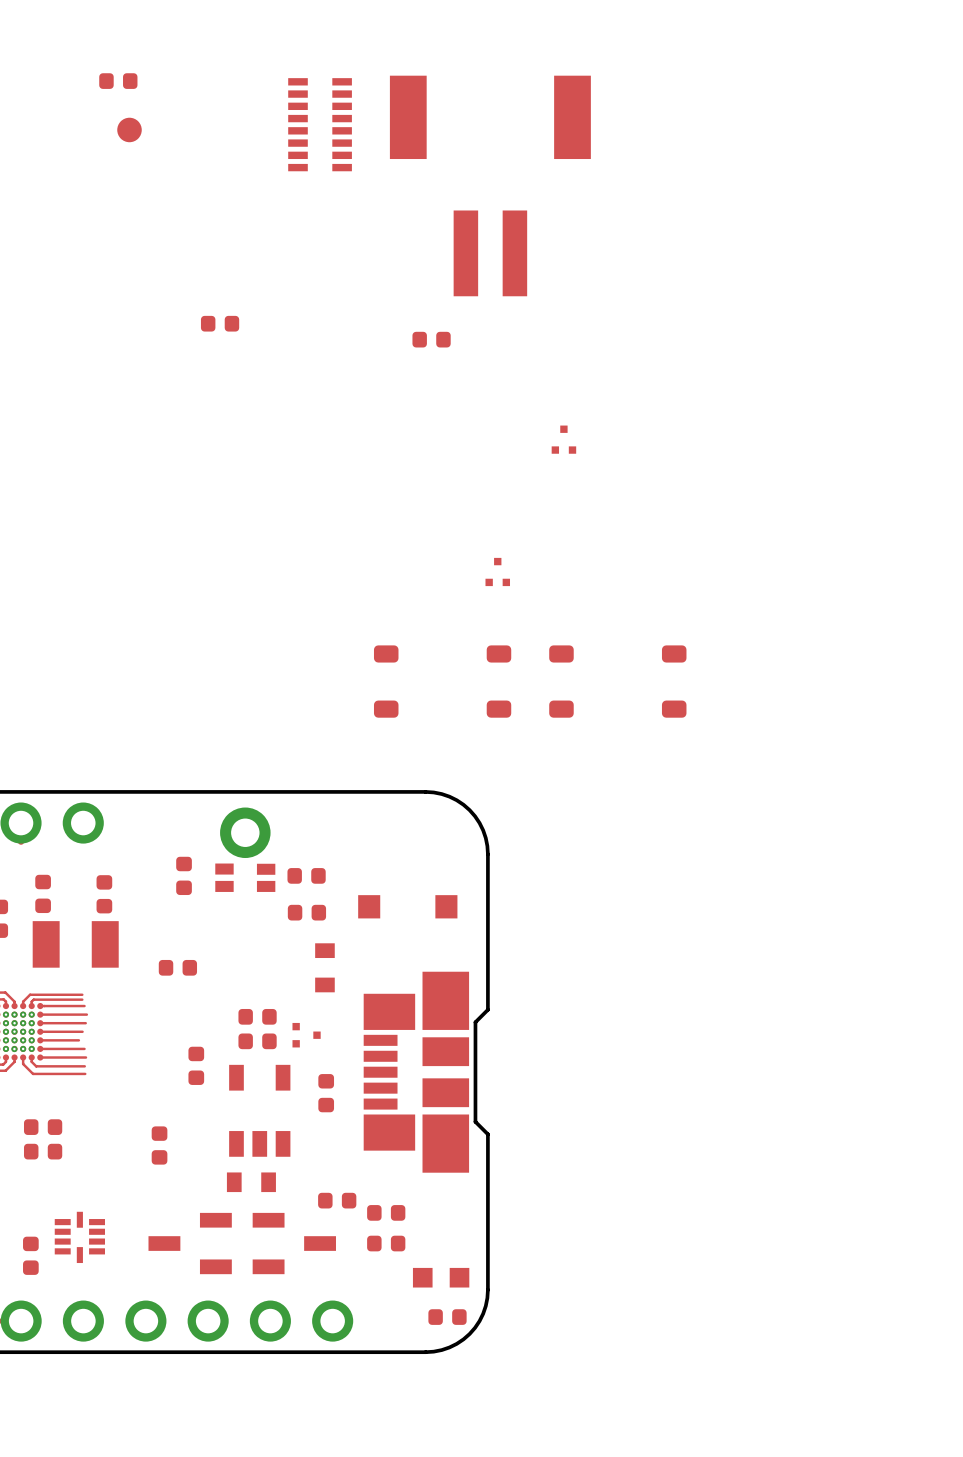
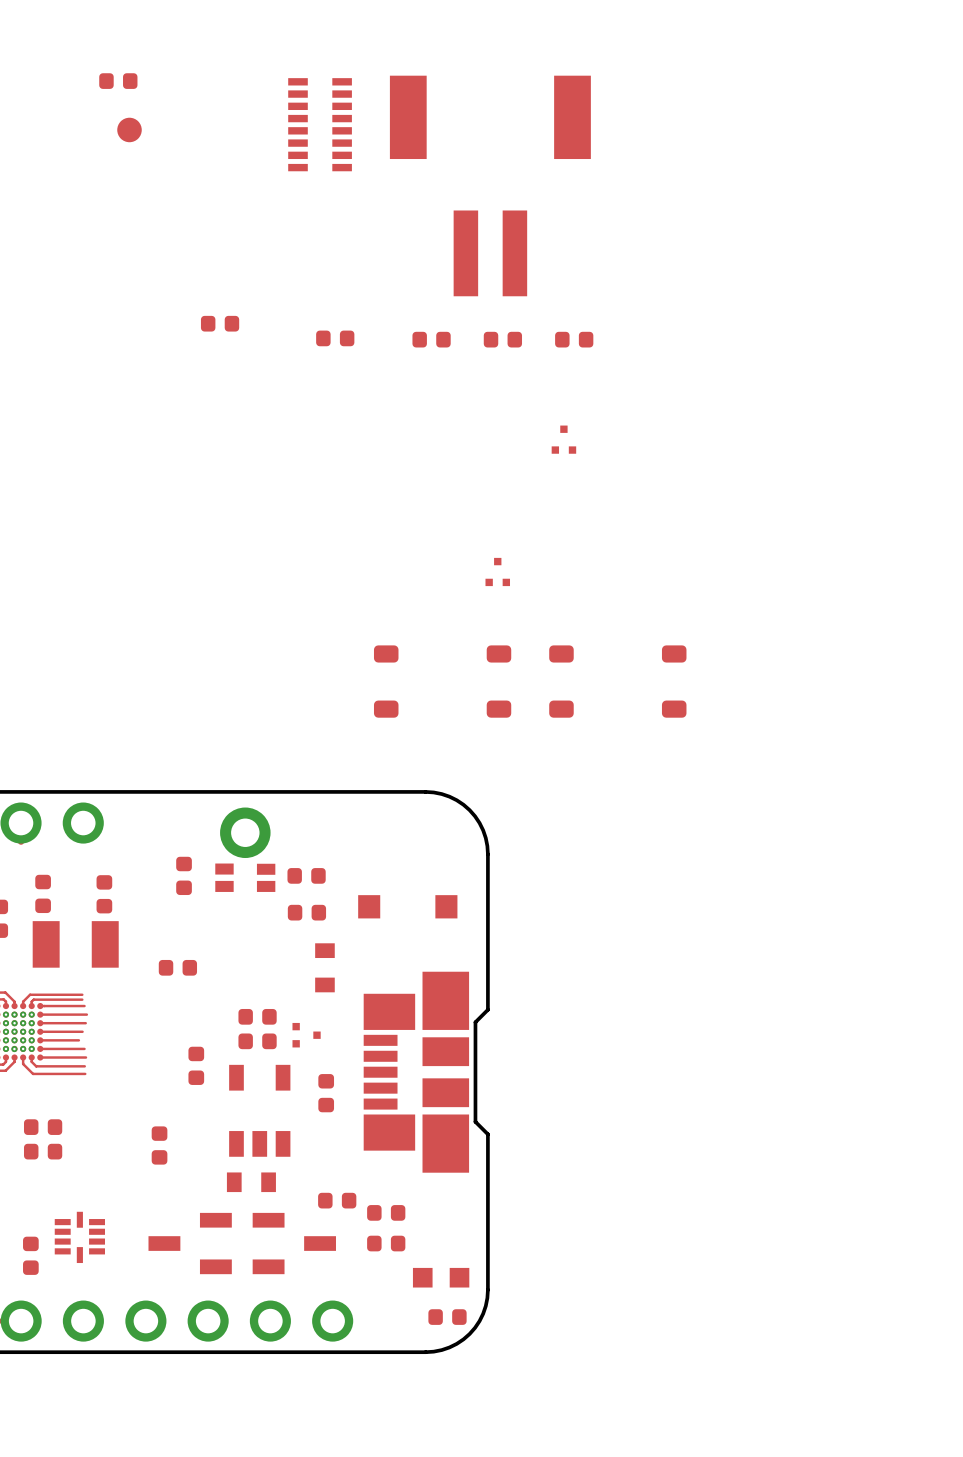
part: none -> (335, 338)
part: none -> (502, 339)
part: none -> (574, 339)

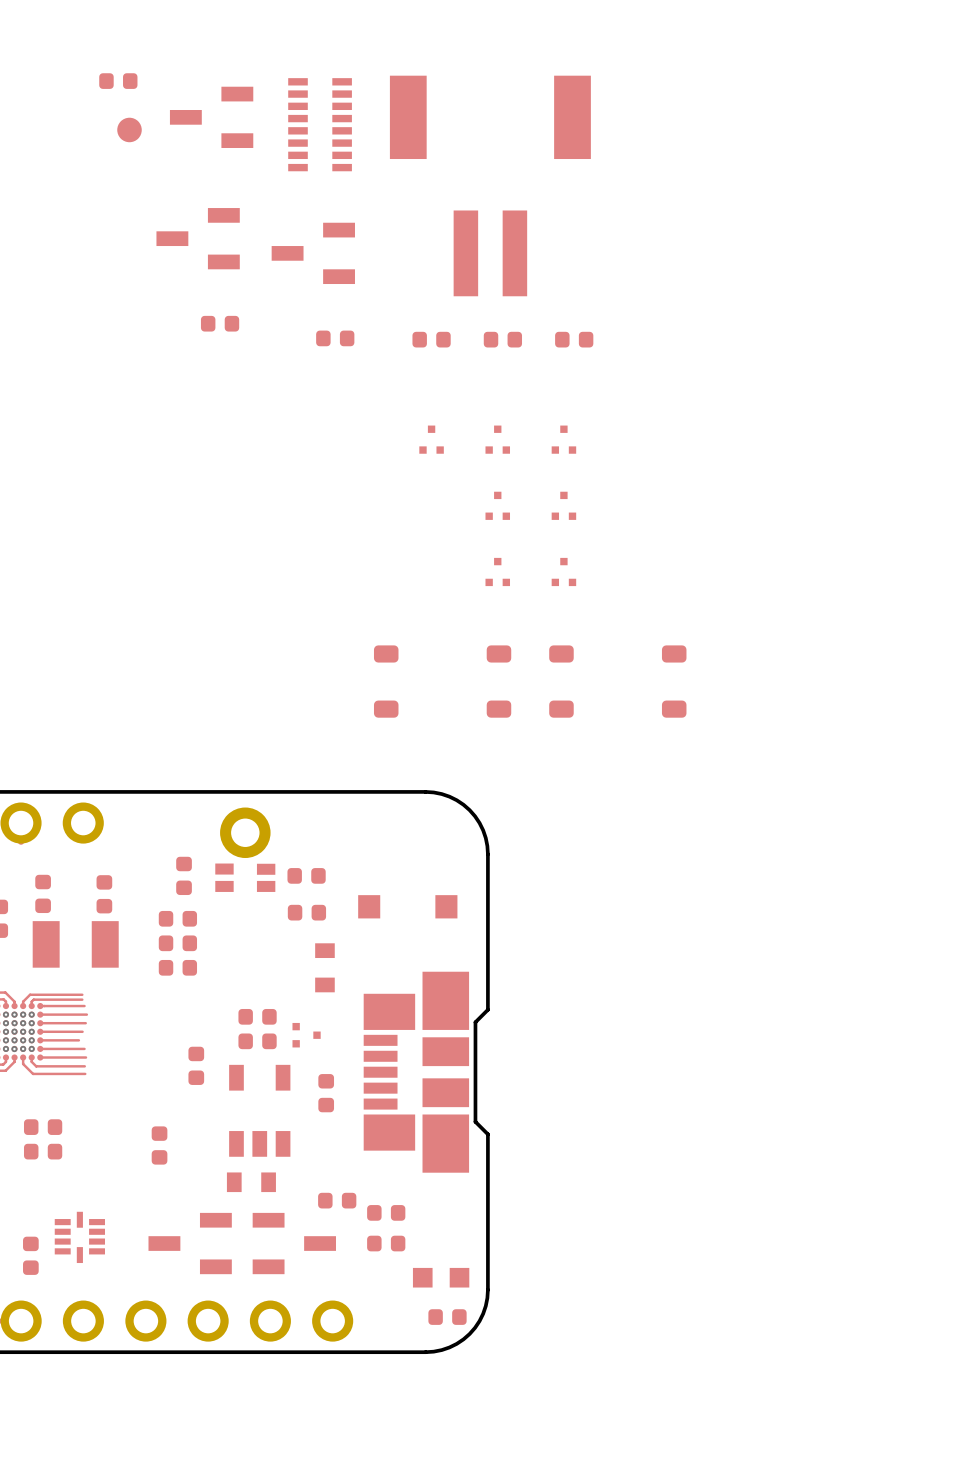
part: none -> (211, 117)
part: none -> (198, 238)
part: none -> (313, 253)
part: none -> (431, 439)
part: none -> (497, 439)
part: none -> (497, 505)
part: none -> (563, 505)
part: none -> (563, 571)
part: none -> (177, 918)
part: none -> (177, 943)

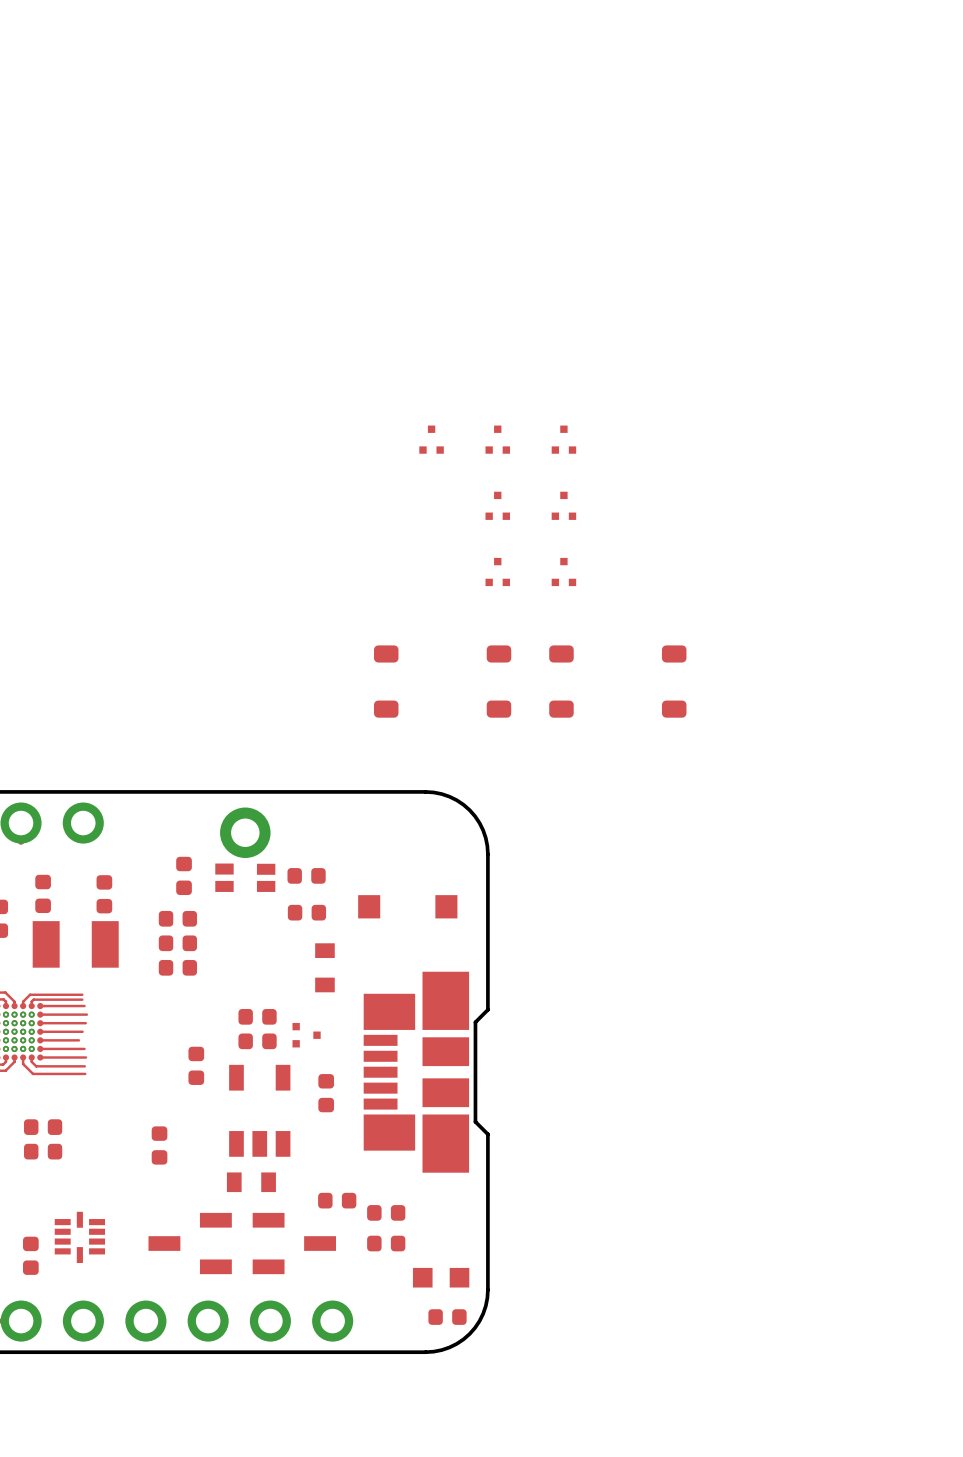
part: (118, 81) -> none
part: (211, 117) -> none
part: (320, 124) -> none
part: (129, 129) -> none
part: (490, 185) -> none
part: (198, 238) -> none
part: (313, 253) -> none
part: (220, 323) -> none
part: (335, 338) -> none
part: (431, 339) -> none
part: (502, 339) -> none
part: (574, 339) -> none

